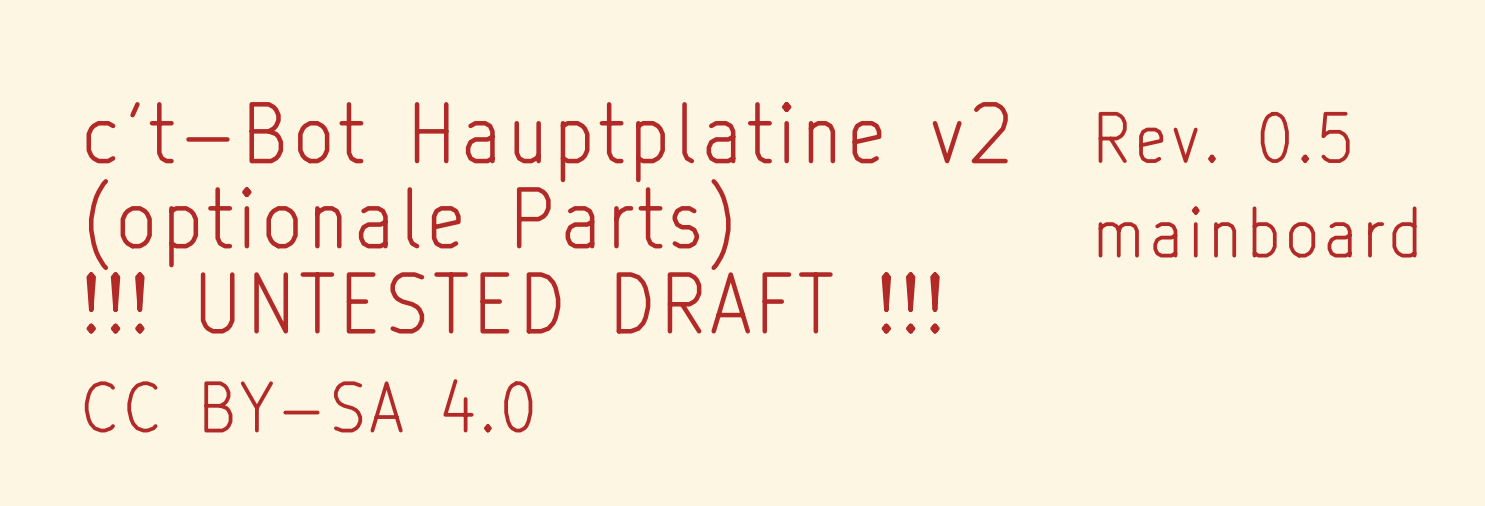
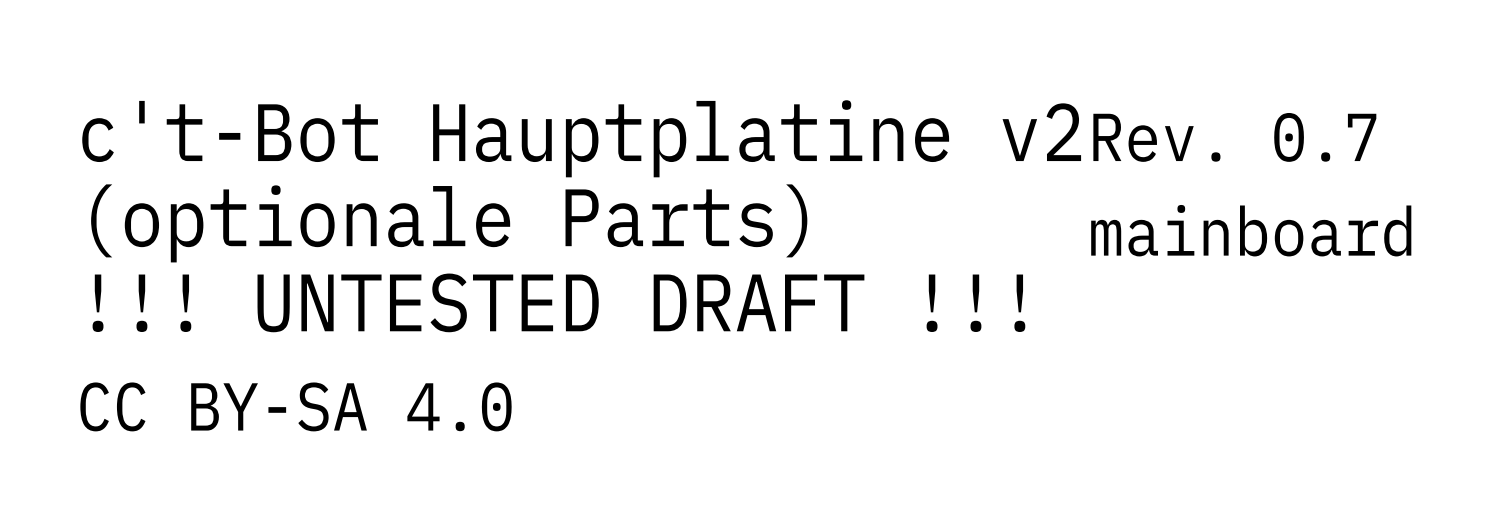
text: Rev. 0.5 (1224, 137) -> Rev. 0.7 (1234, 137)

